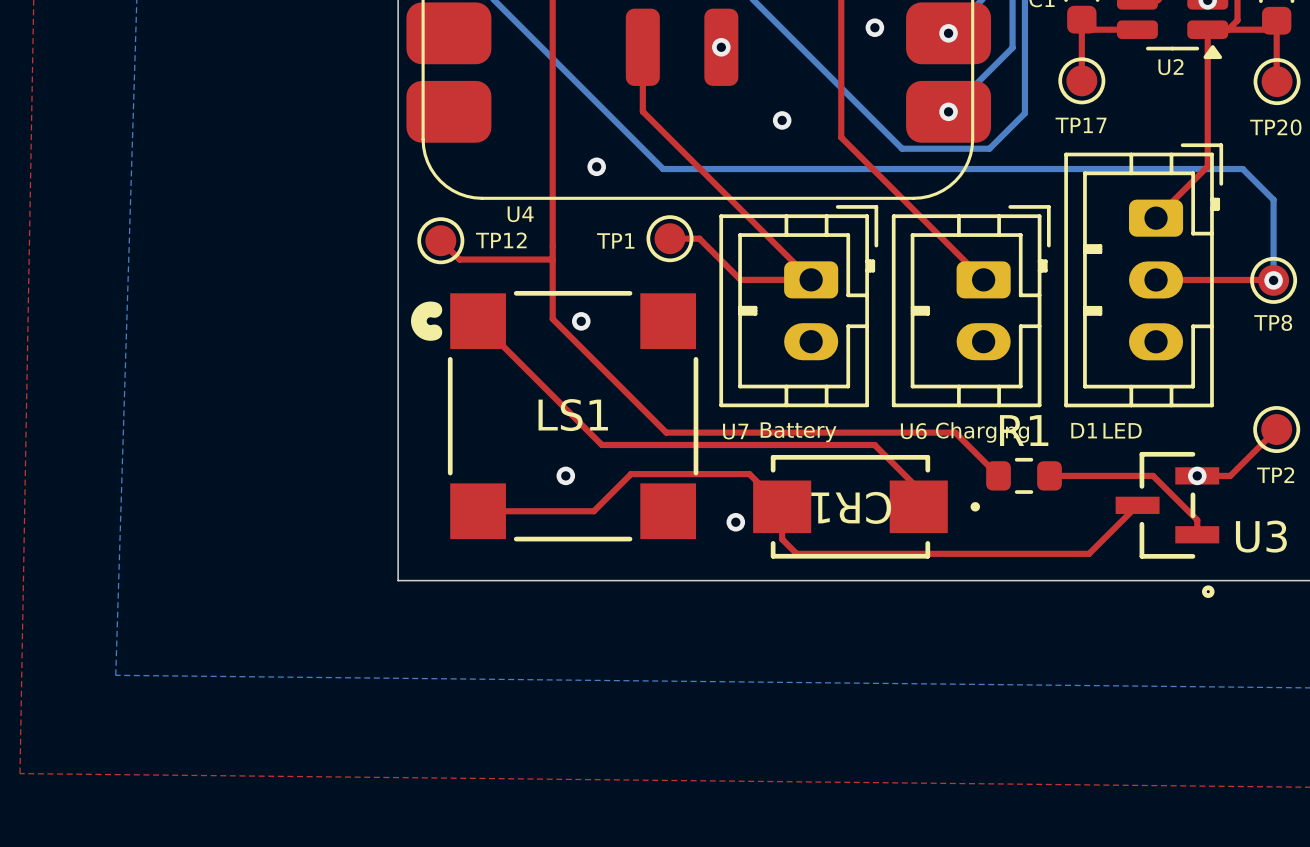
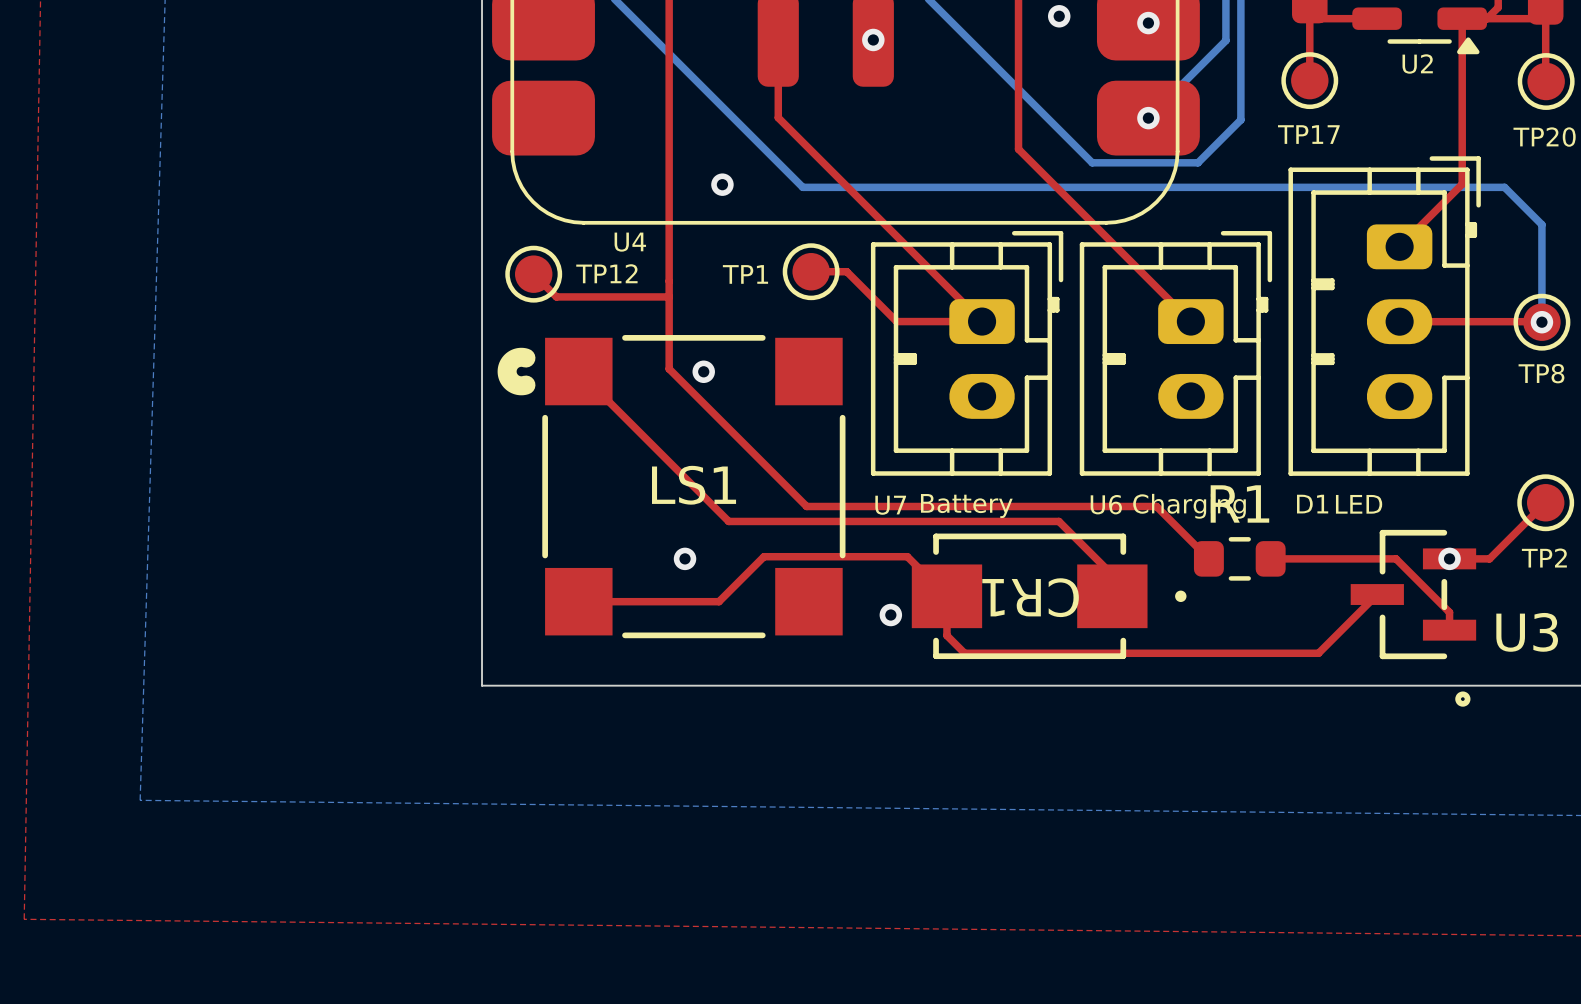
via: (782, 120) -> none

